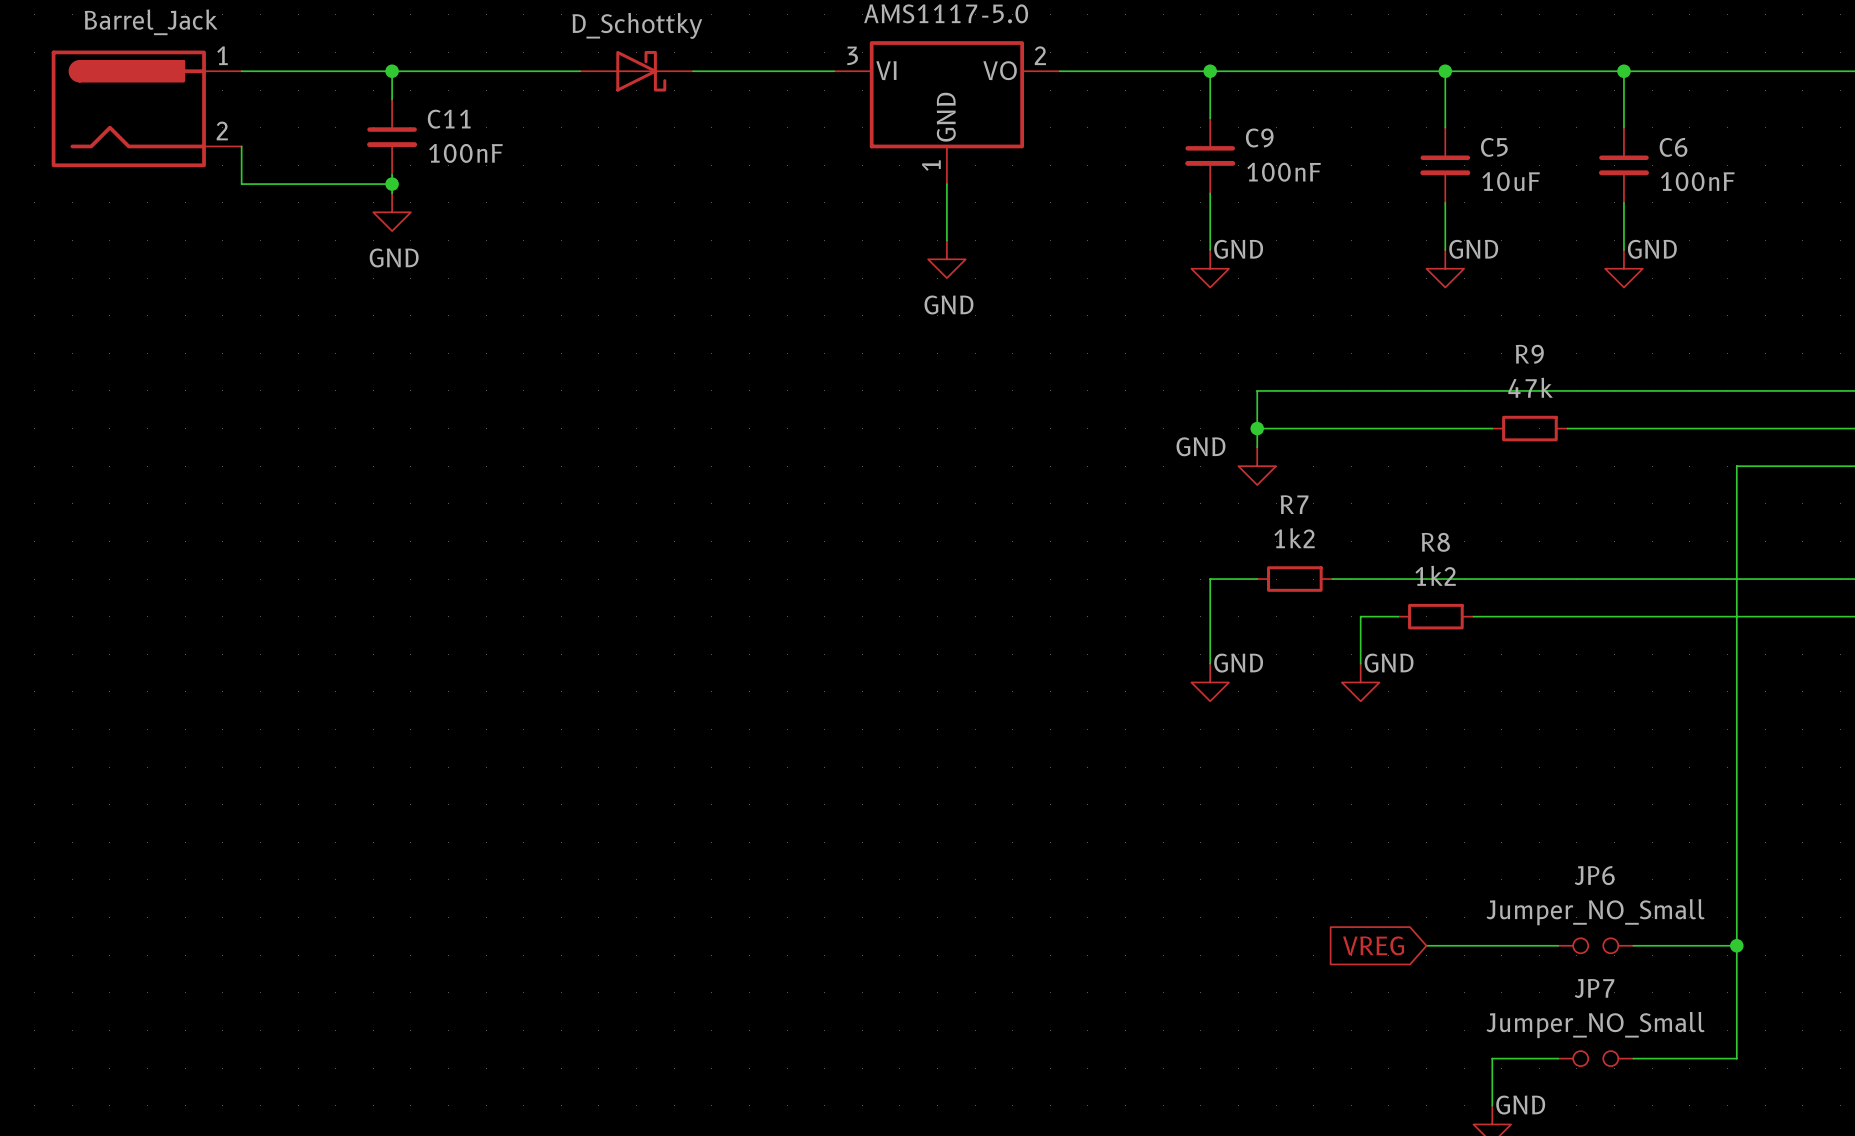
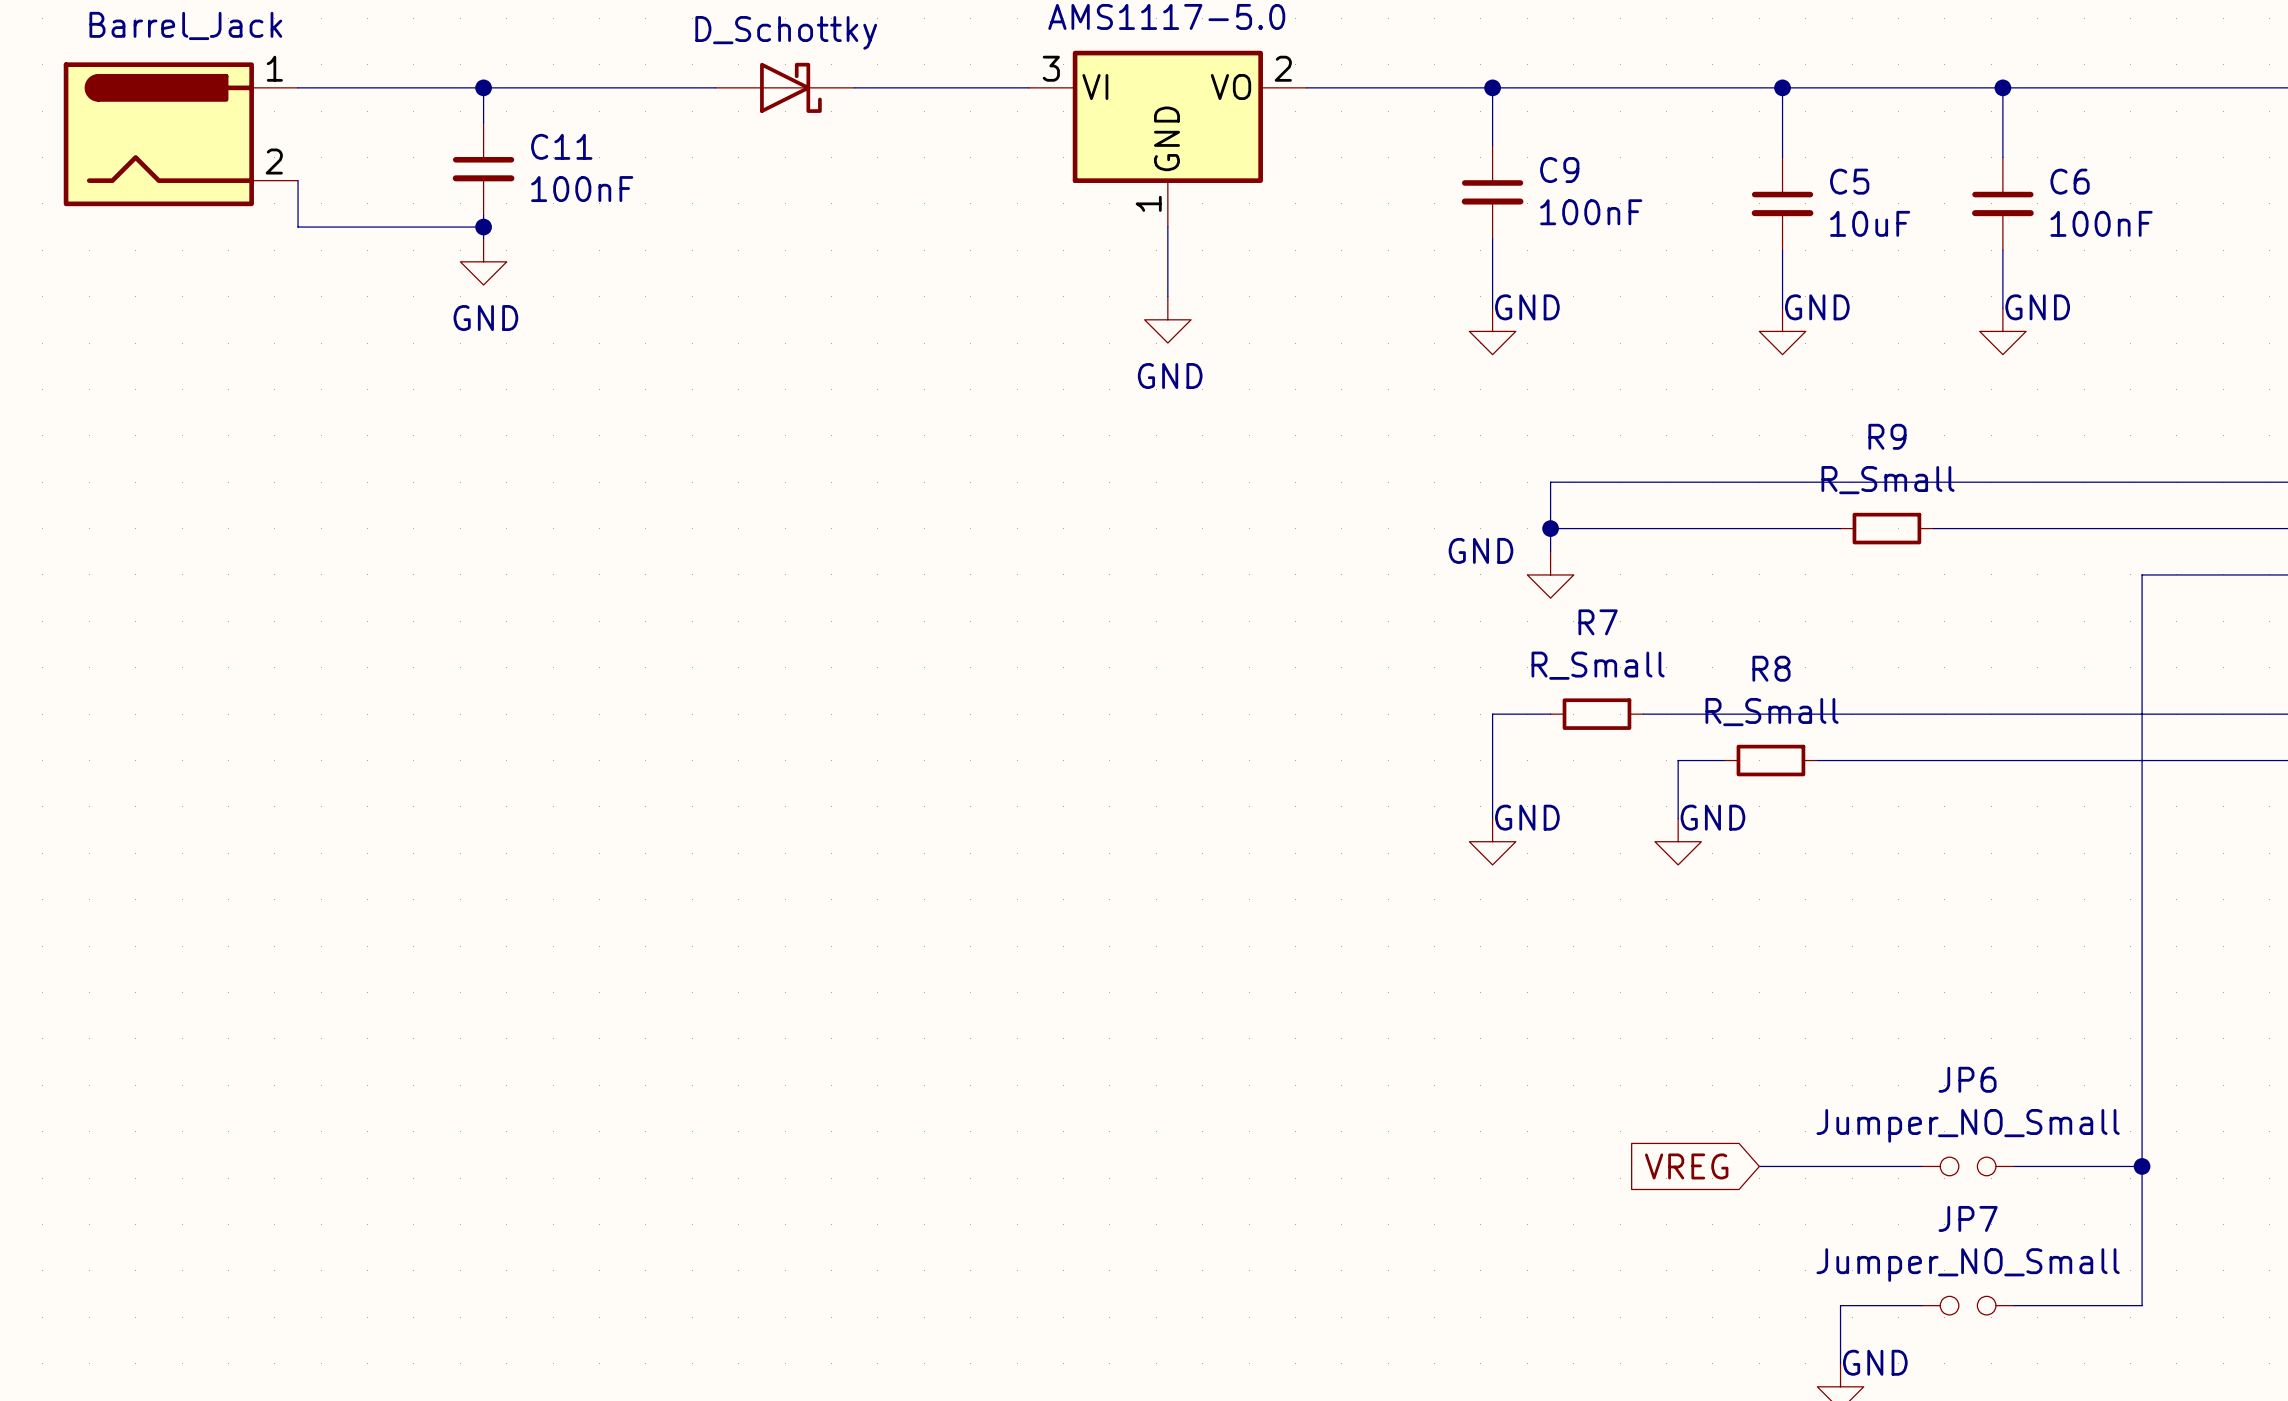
R9 value: 47k (1530, 387) -> R_Small (1888, 480)
R7 value: 1k2 (1294, 538) -> R_Small (1598, 665)
R8 value: 1k2 (1435, 575) -> R_Small (1772, 712)

